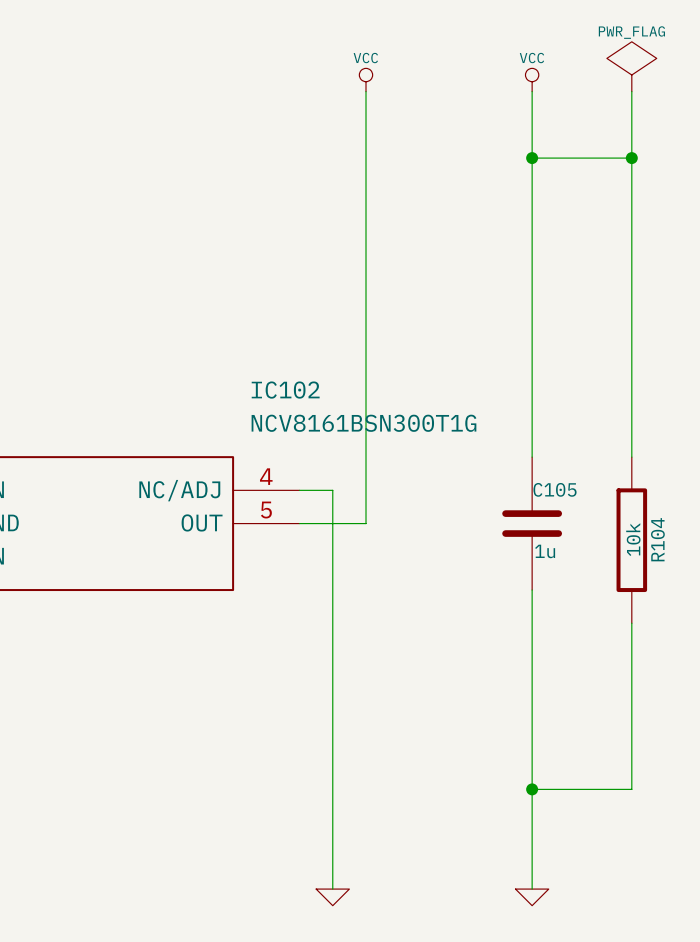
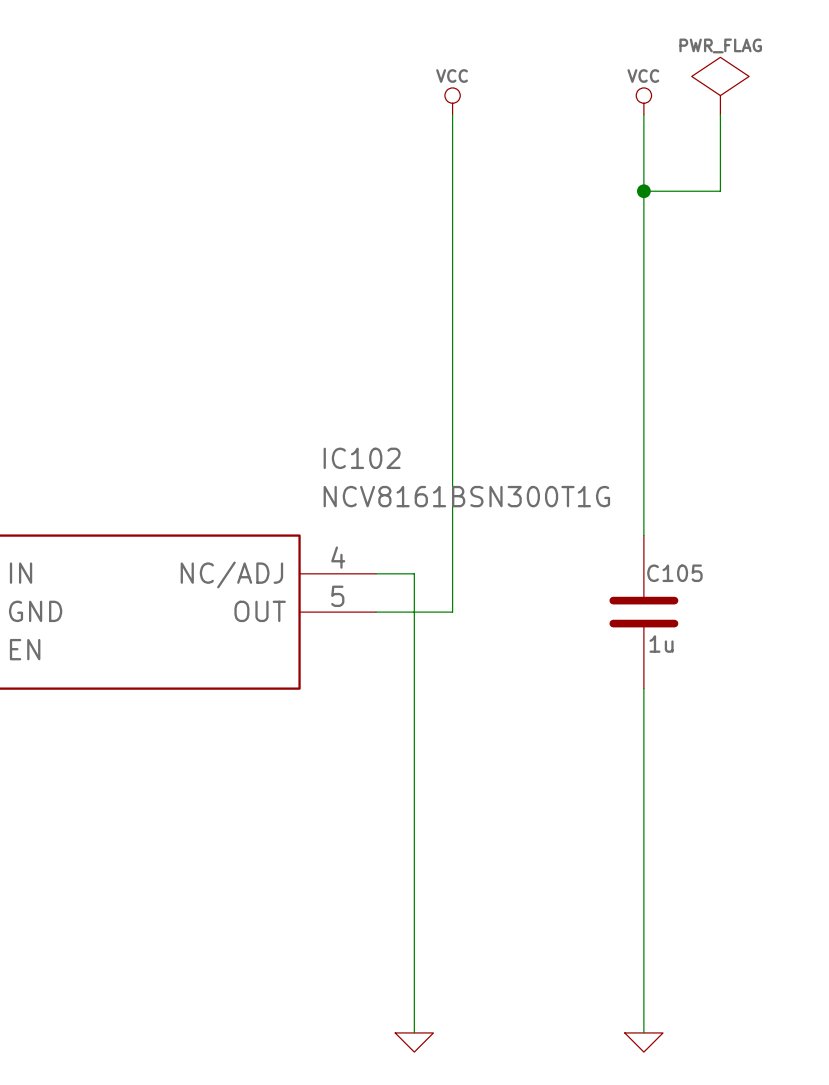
power symbol position: PWR_FLAG (631, 66) -> PWR_FLAG (720, 86)
wire: (631, 91) (631, 457) -> none
wire: (598, 158) (631, 158) -> (720, 191) (720, 114)
junction: (631, 158) -> none
R104: 10k (631, 540) -> none
wire: (631, 623) (631, 789) (532, 789) -> none
junction: (532, 789) -> none

